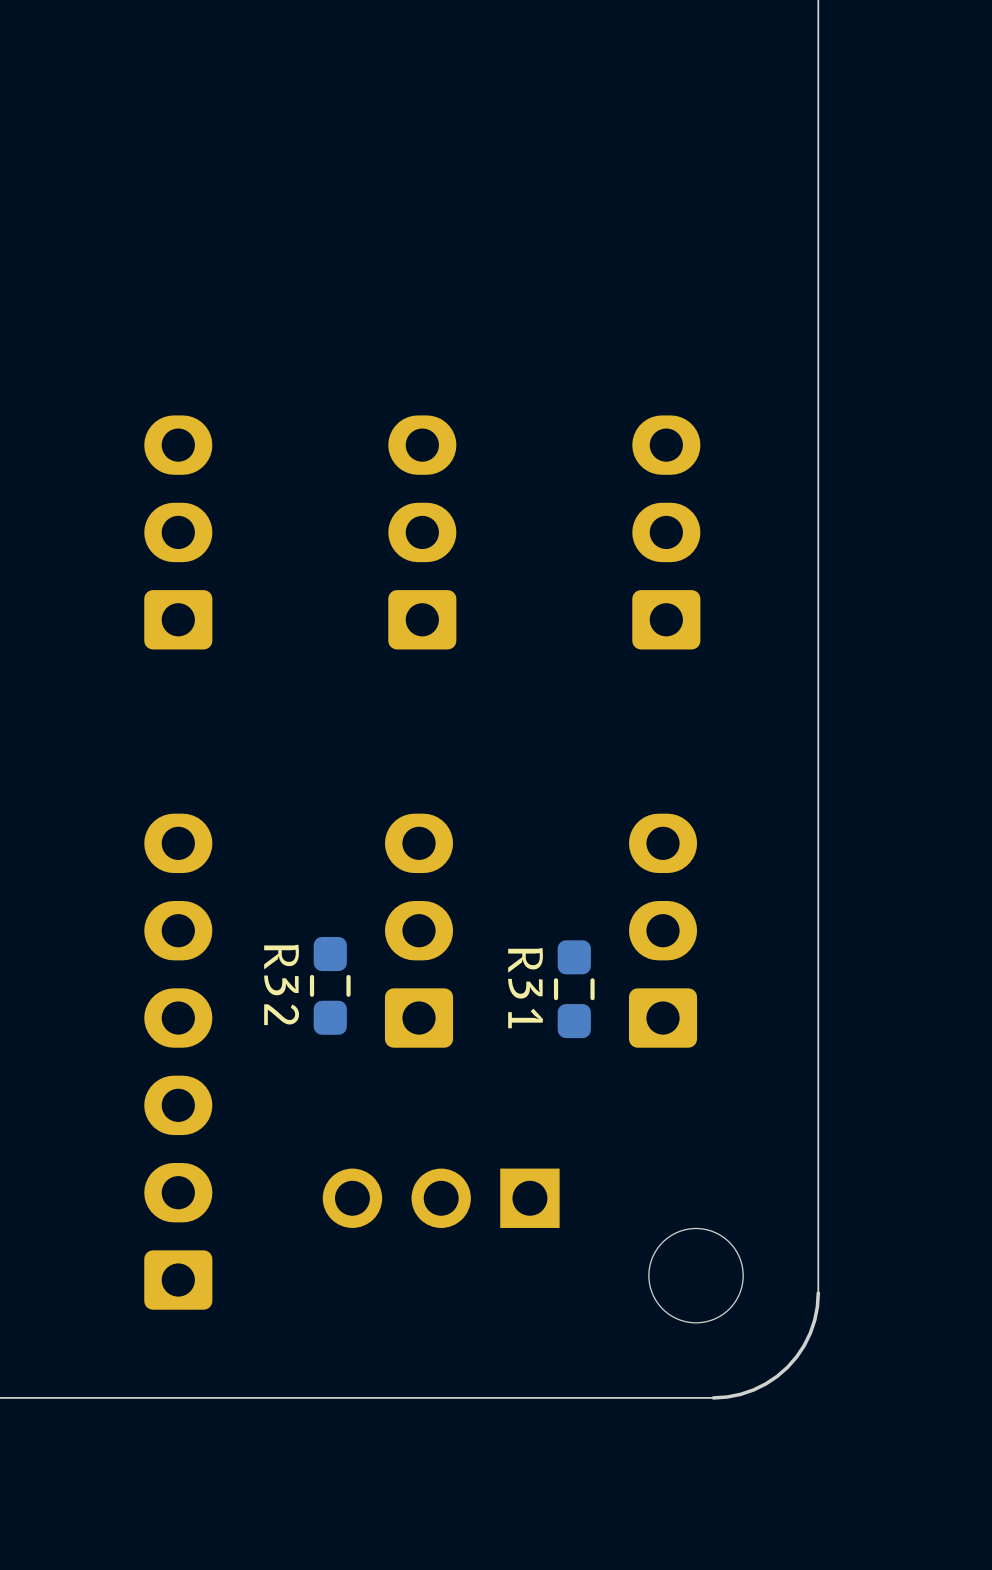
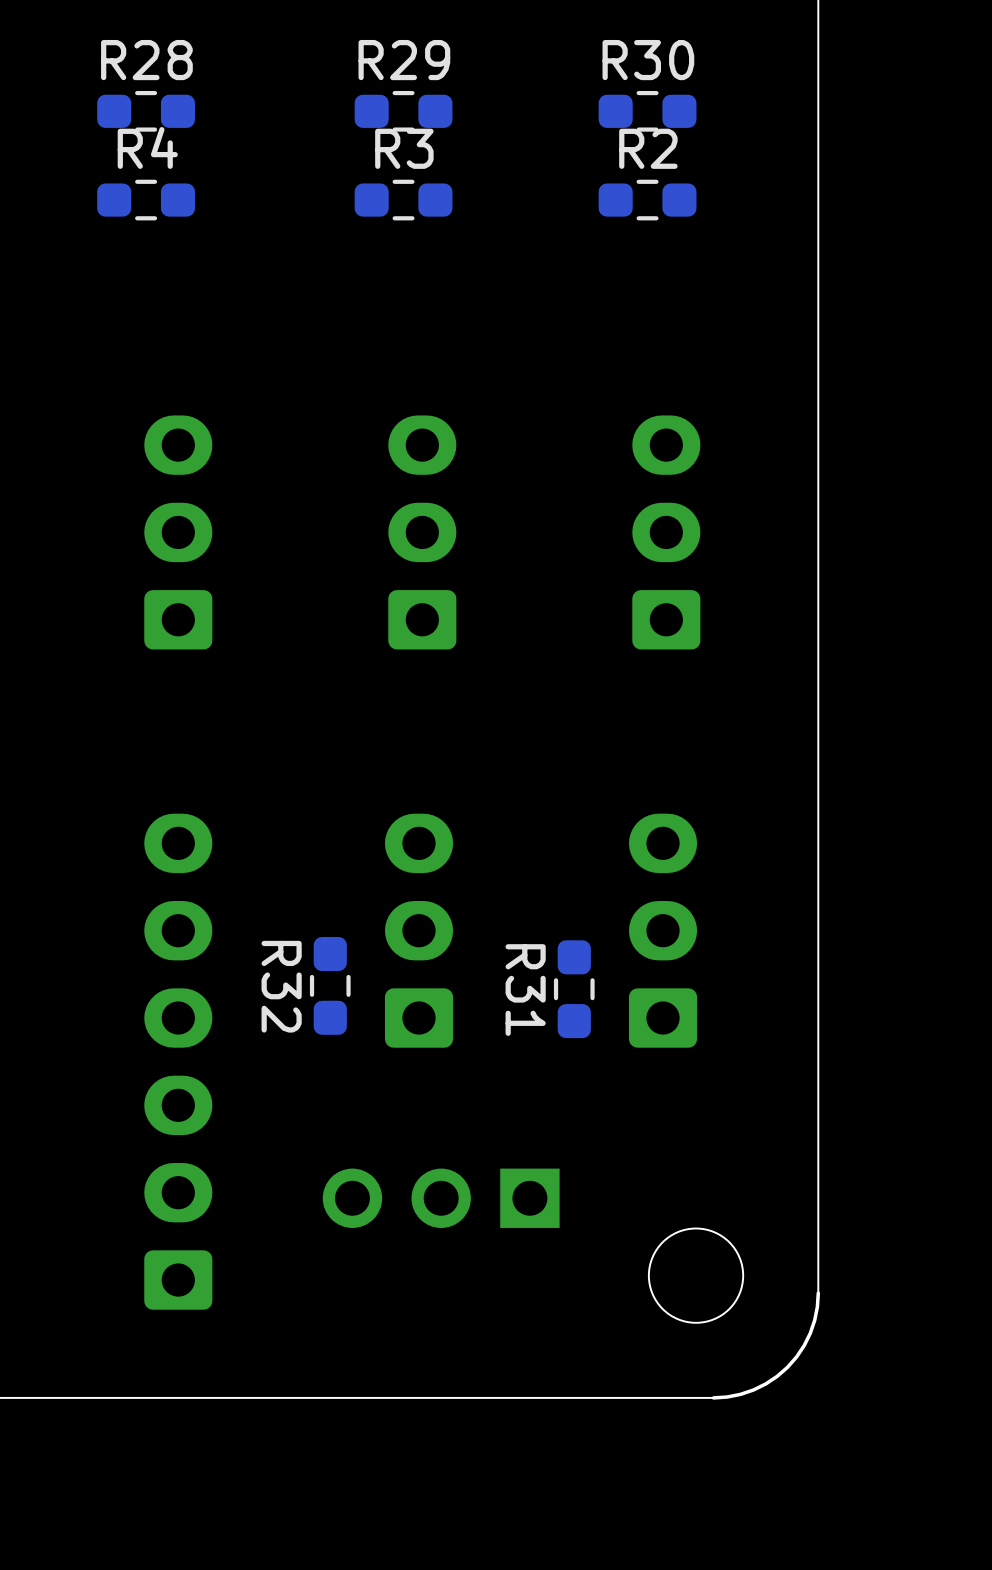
R28: none -> (146, 111)
R29: none -> (403, 111)
R30: none -> (647, 111)
R4: none -> (146, 200)
R3: none -> (403, 200)
R2: none -> (647, 200)

